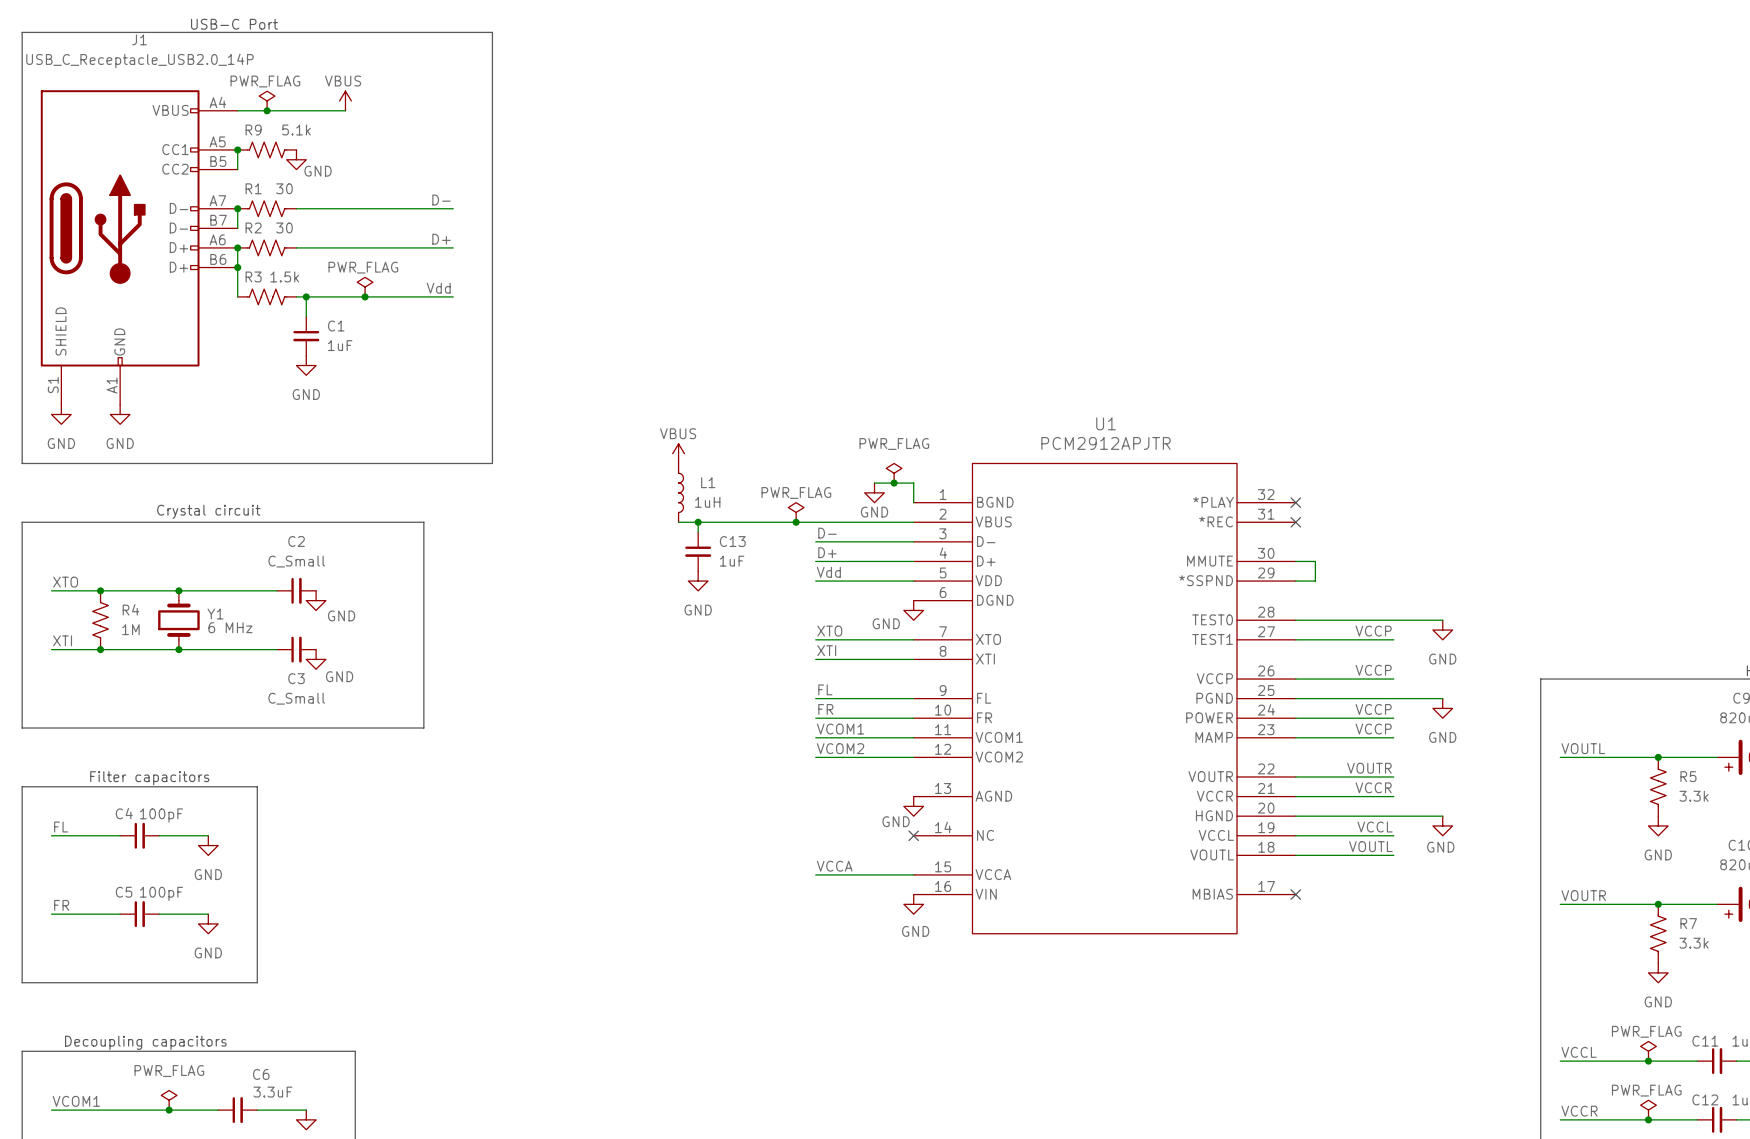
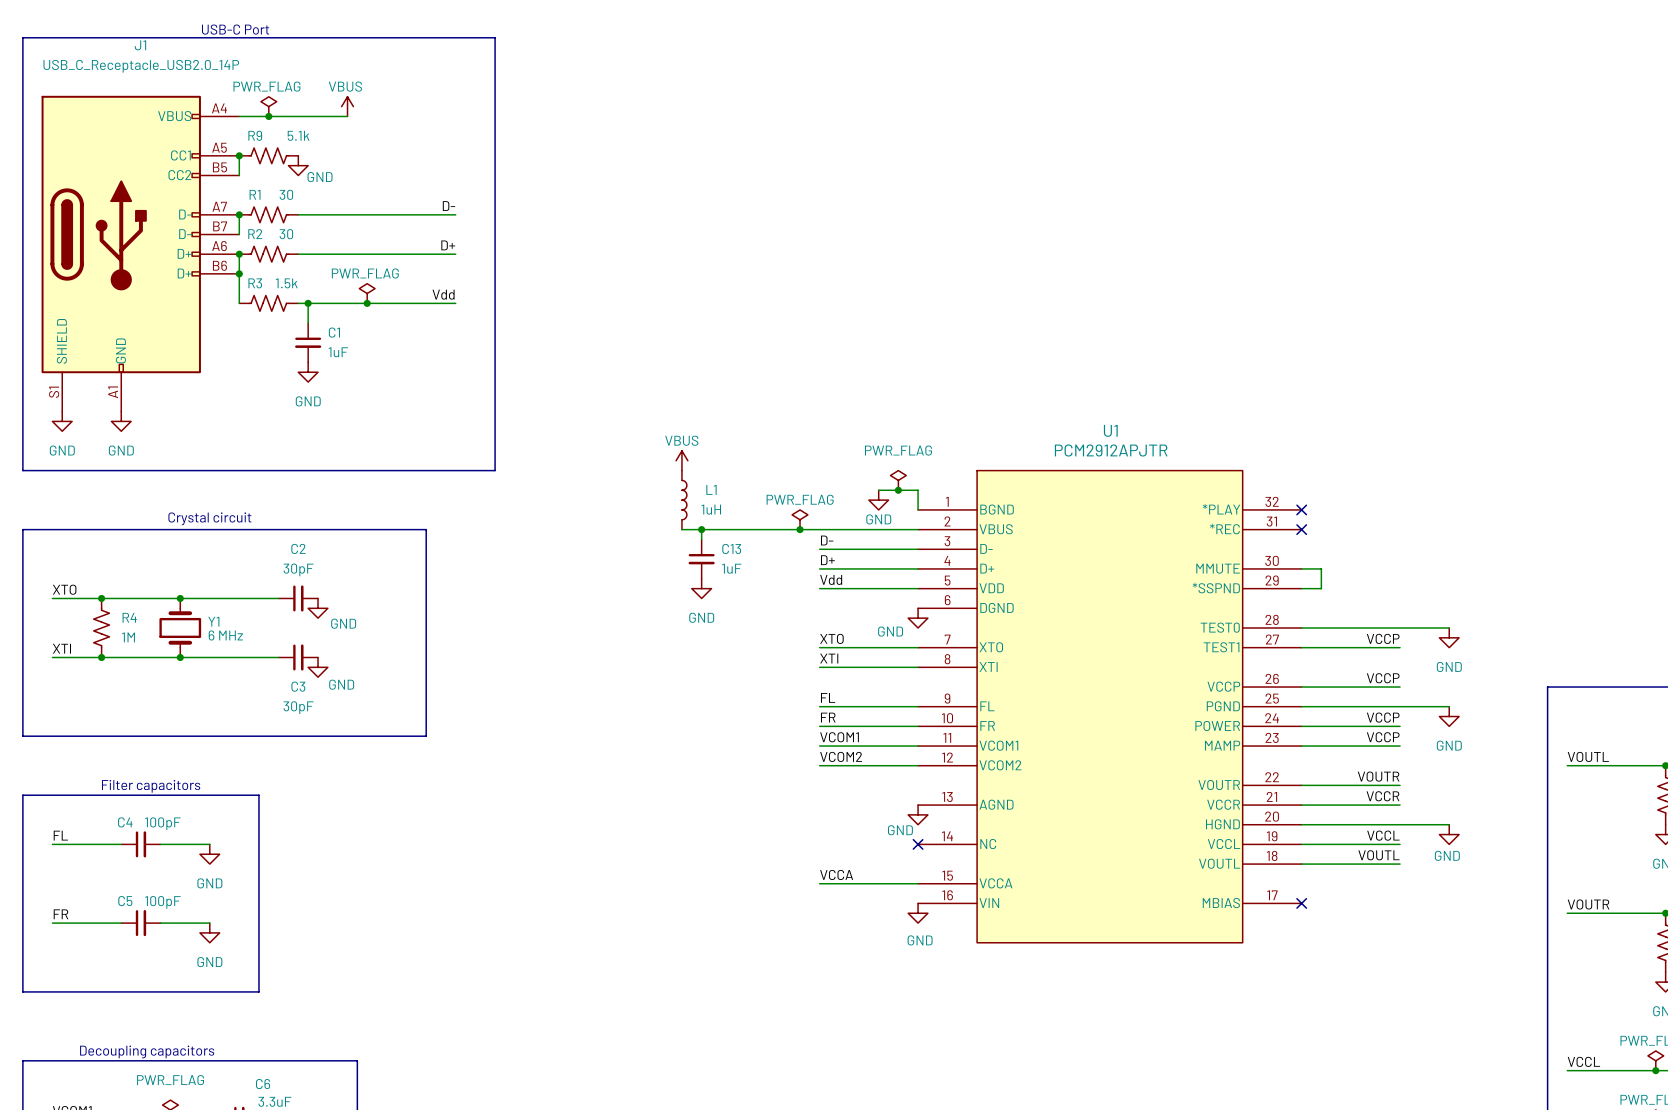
C2 value: C_Small (296, 561) -> 30pF (298, 569)
C3 value: C_Small (296, 698) -> 30pF (298, 707)

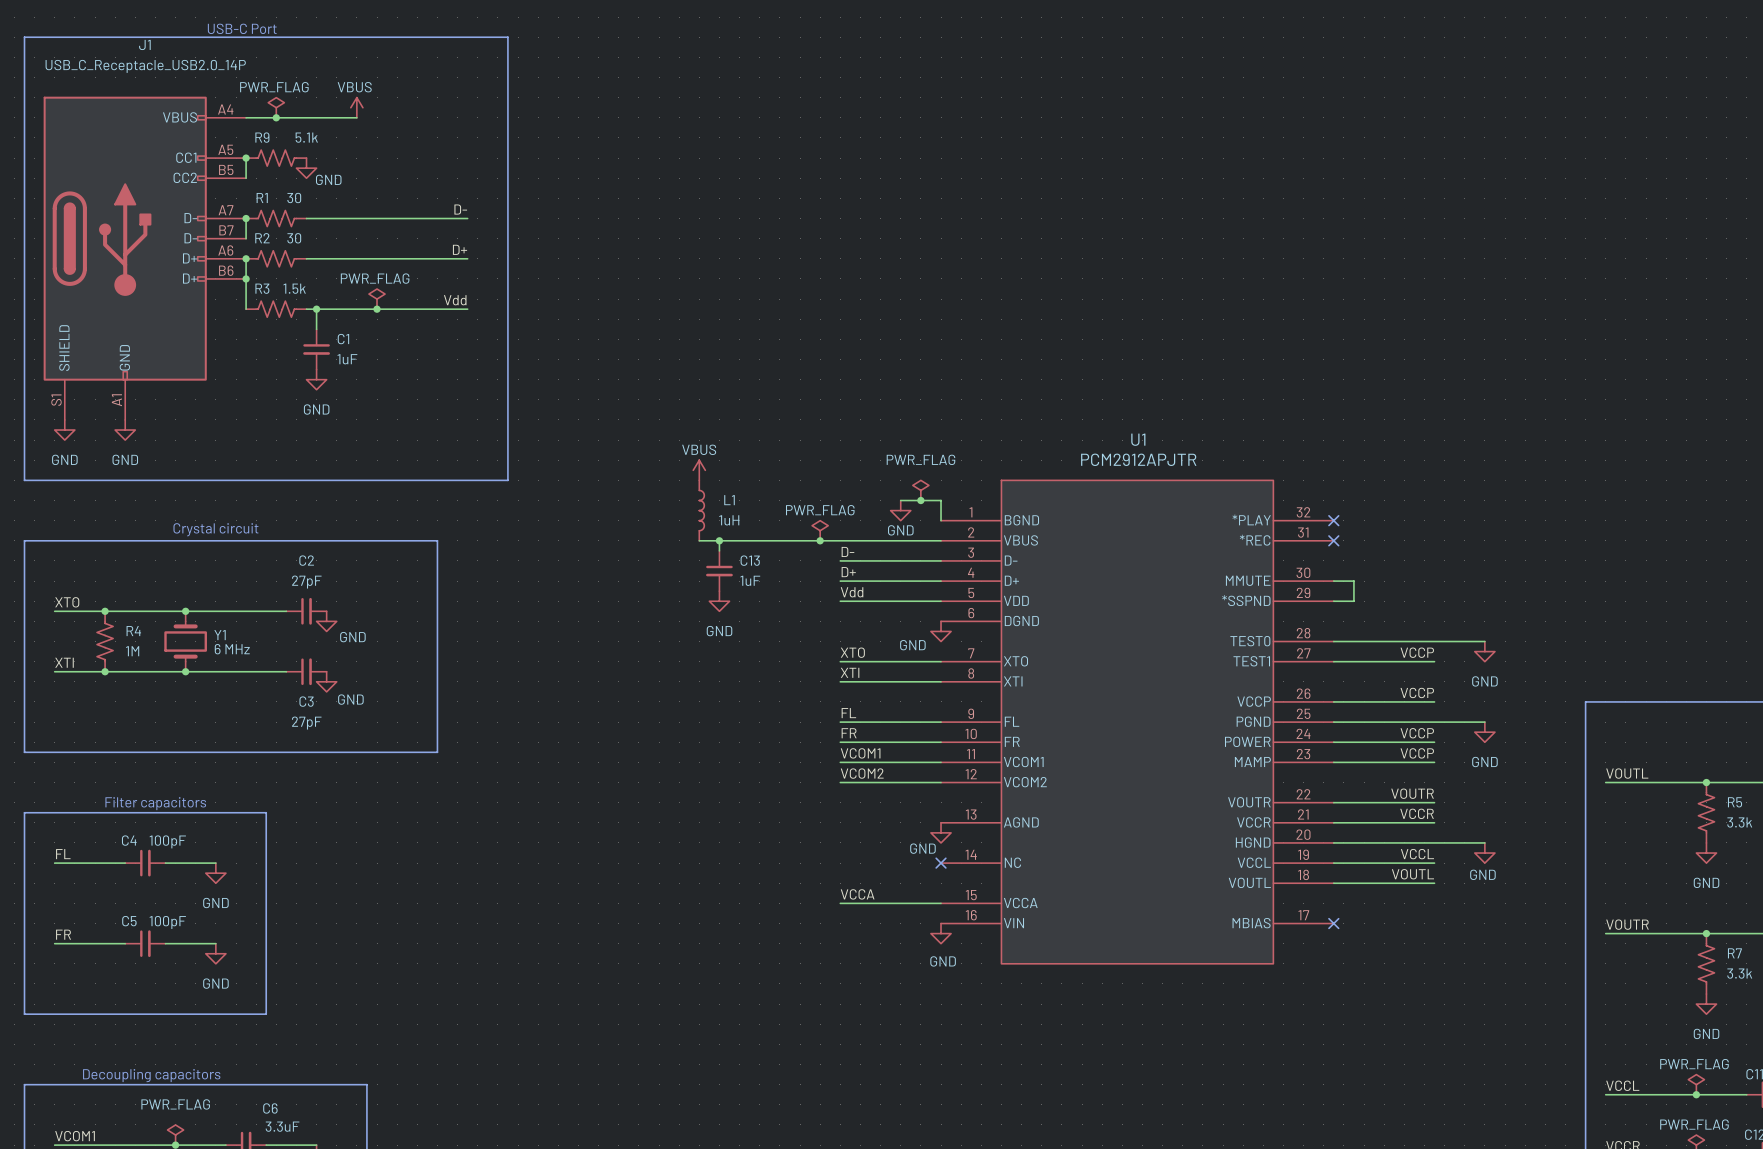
C2 value: 30pF (298, 569) -> 27pF (306, 582)
C3 value: 30pF (298, 707) -> 27pF (306, 723)

